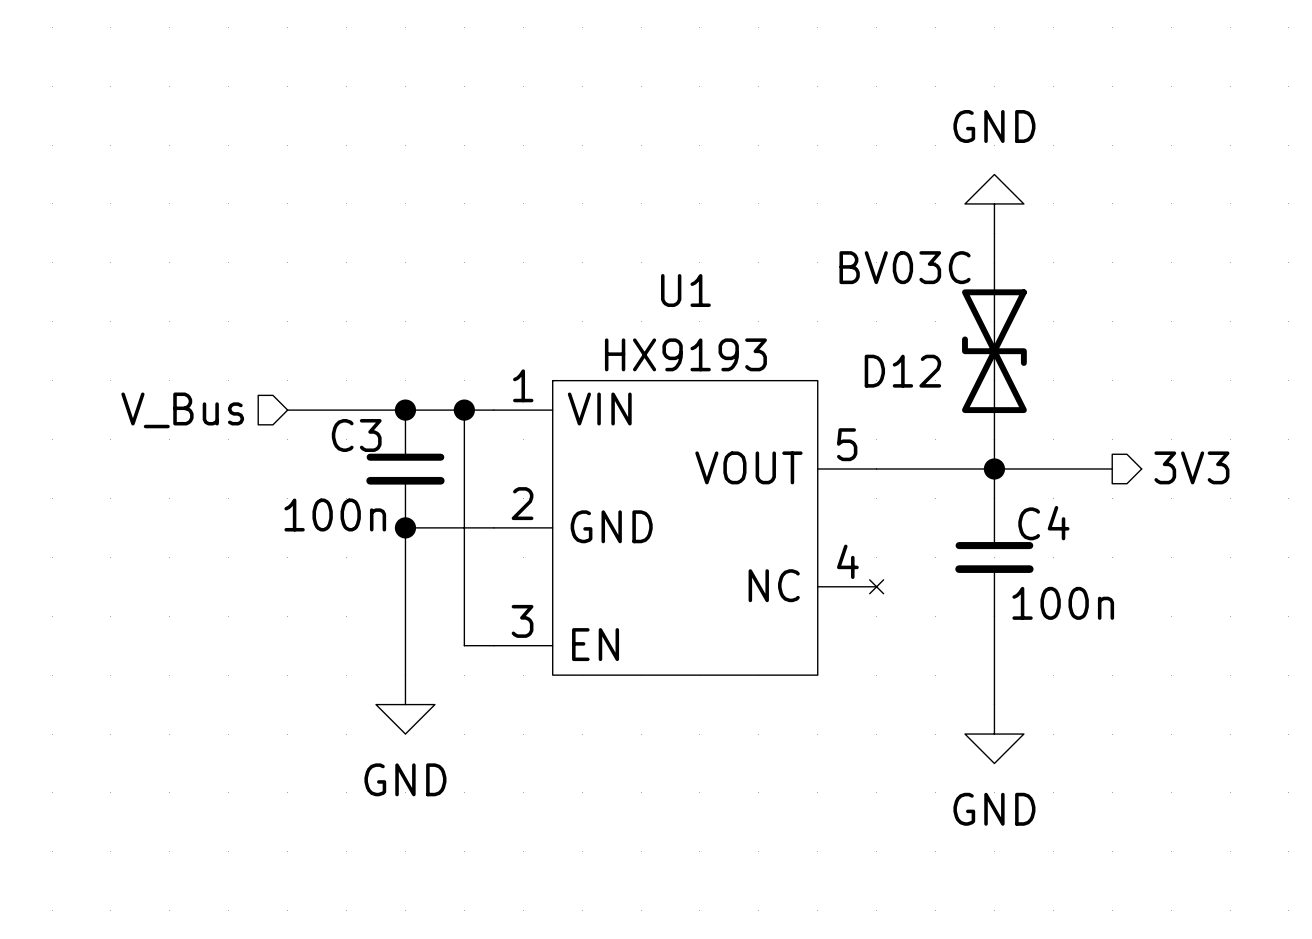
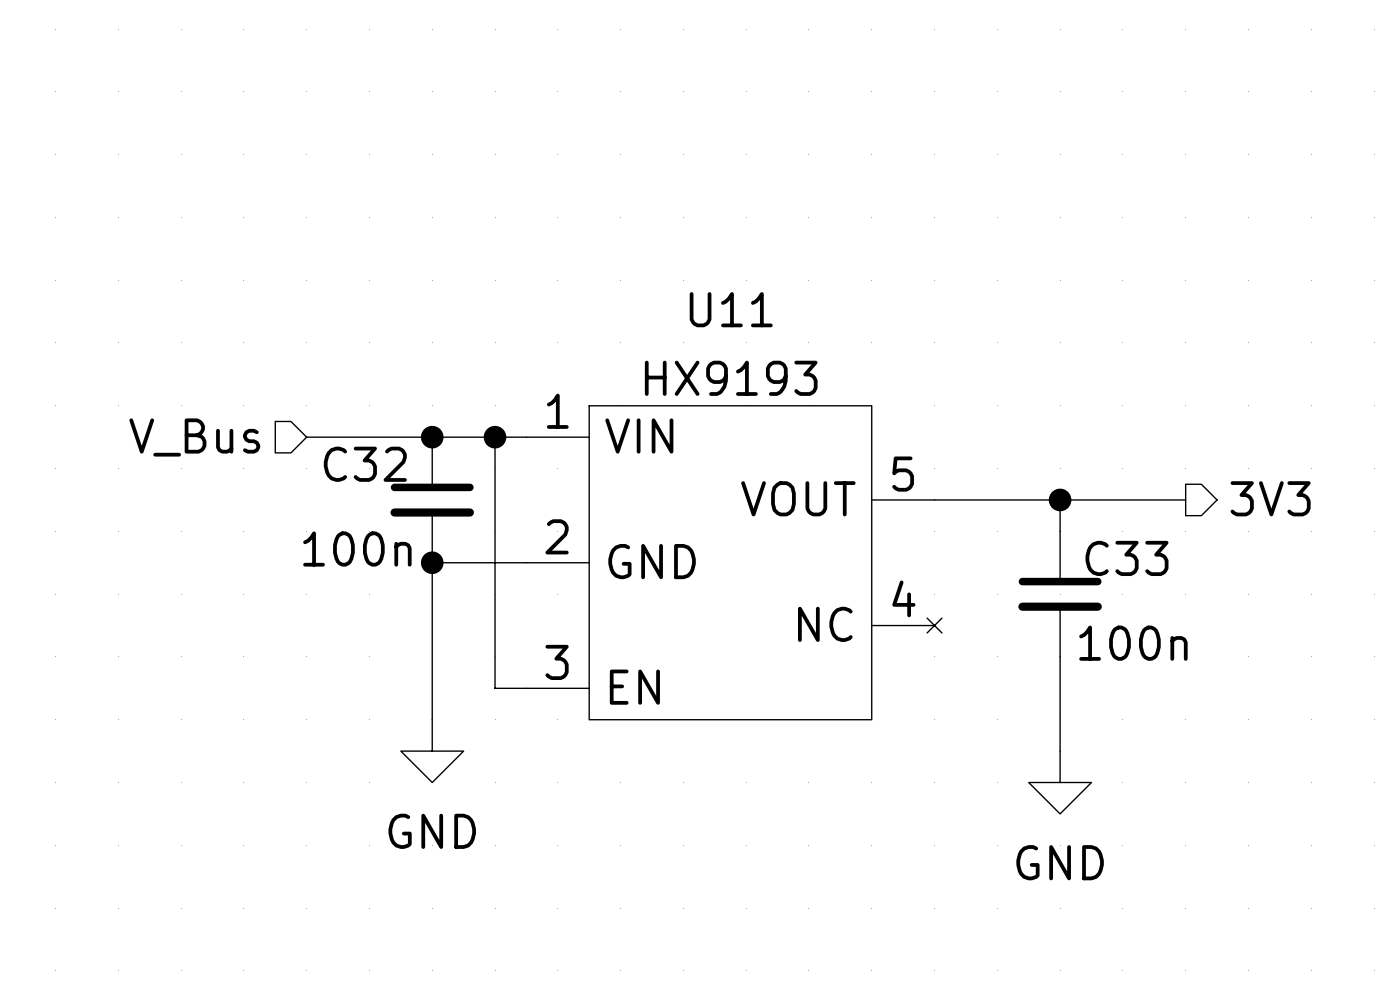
power symbol: GND (994, 203) -> none
wire: (994, 233) (994, 262) -> none
U1 name: U1 (685, 290) -> U11 (731, 309)
D12: BV03C (994, 351) -> none
C3 name: C3 (356, 435) -> C32 (365, 464)
wire: (994, 439) (994, 468) -> none
C4 name: C4 (1043, 523) -> C33 (1127, 558)

